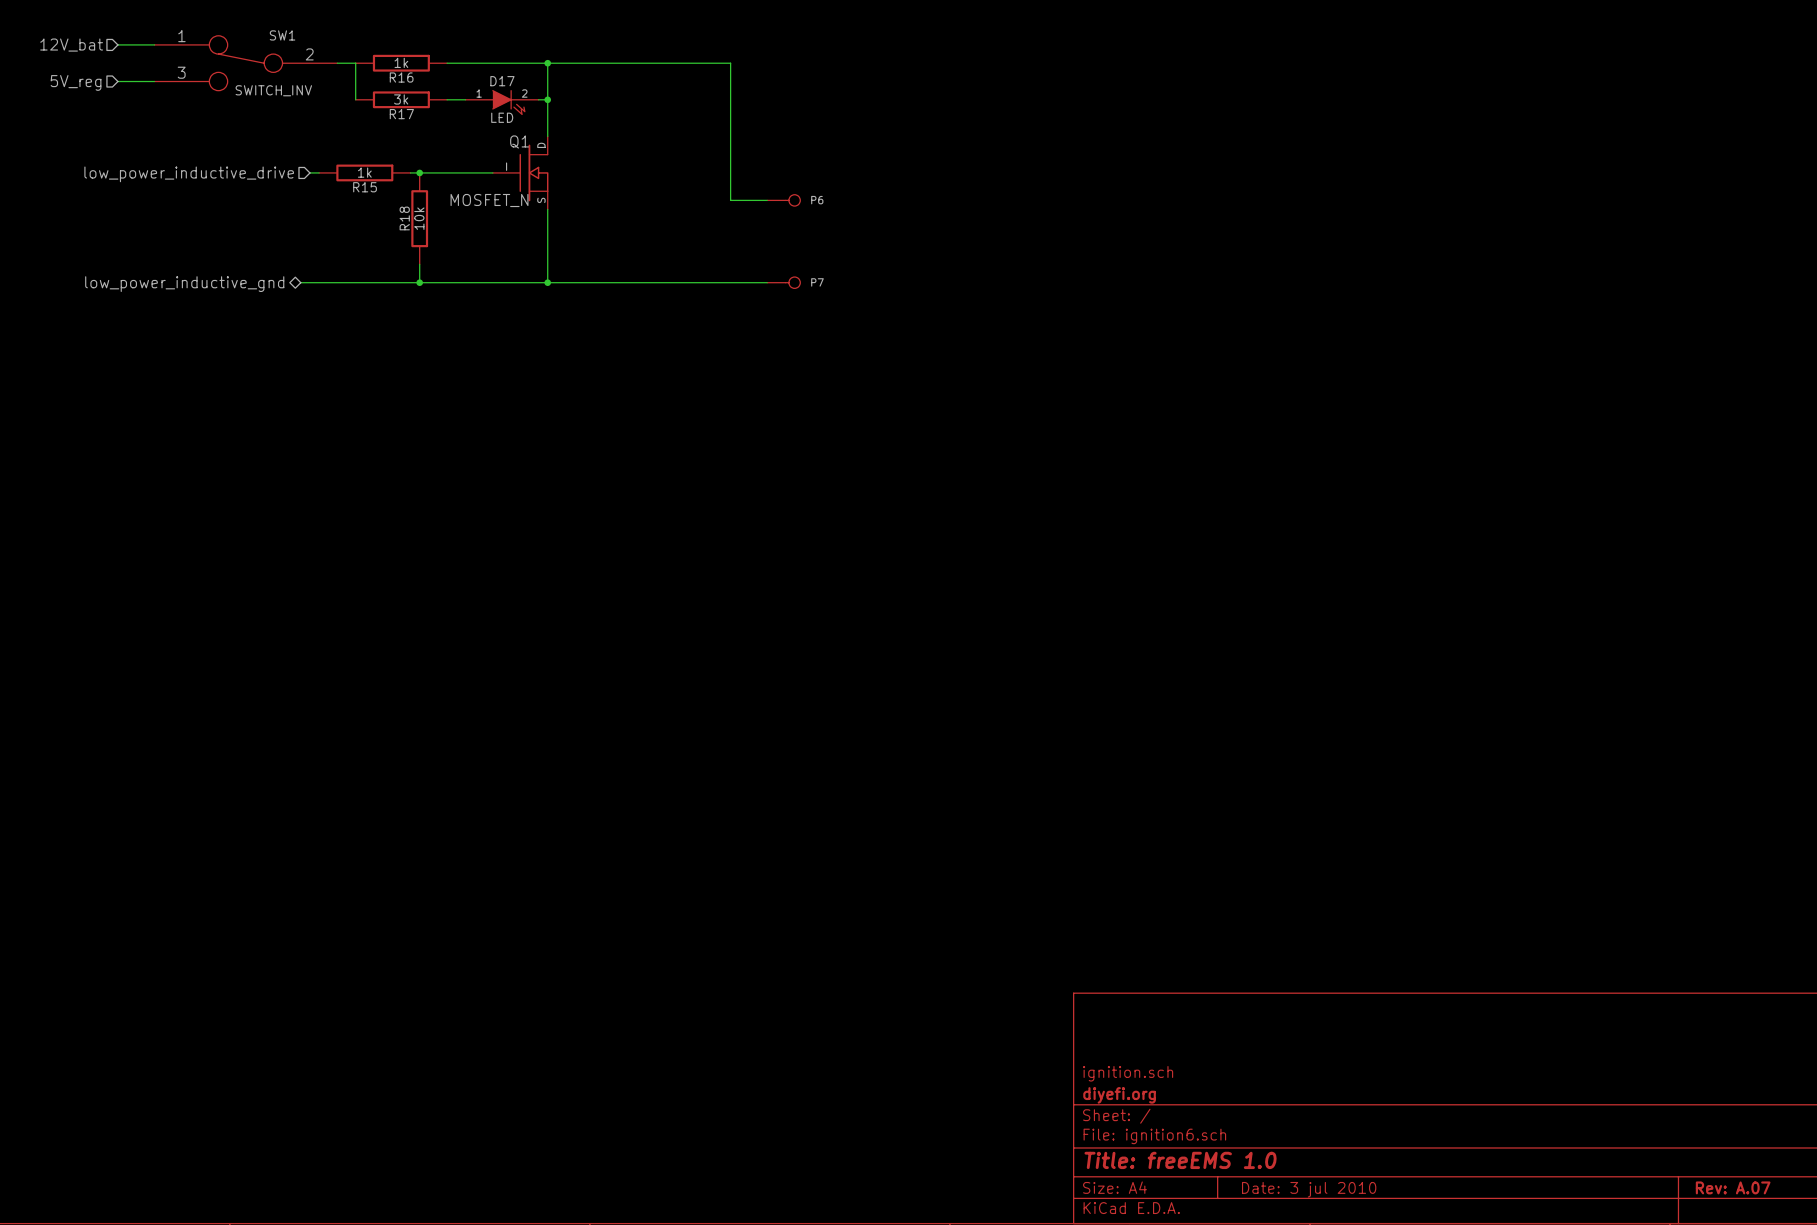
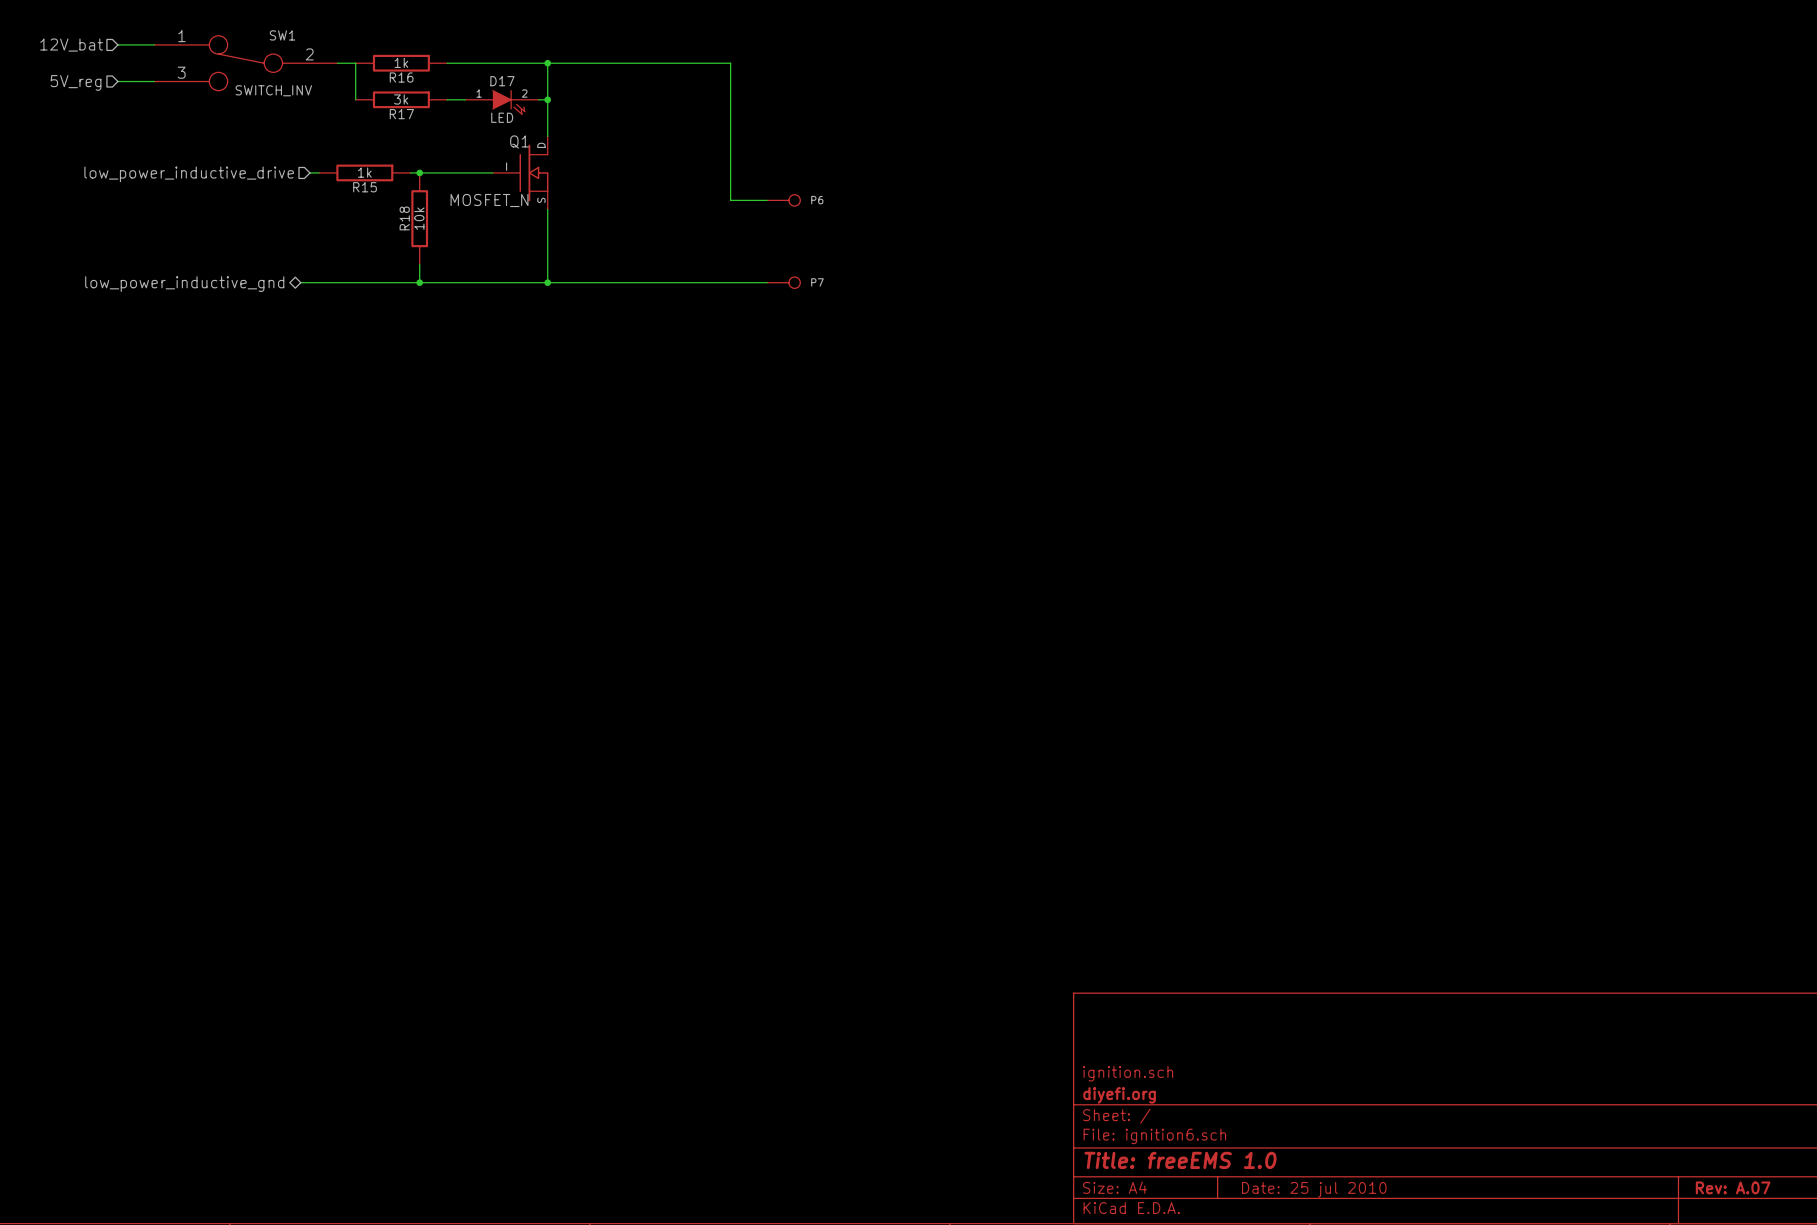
title block: Date: 3 jul 2010 (1309, 1189) -> Date: 25 jul 2010 (1314, 1189)

